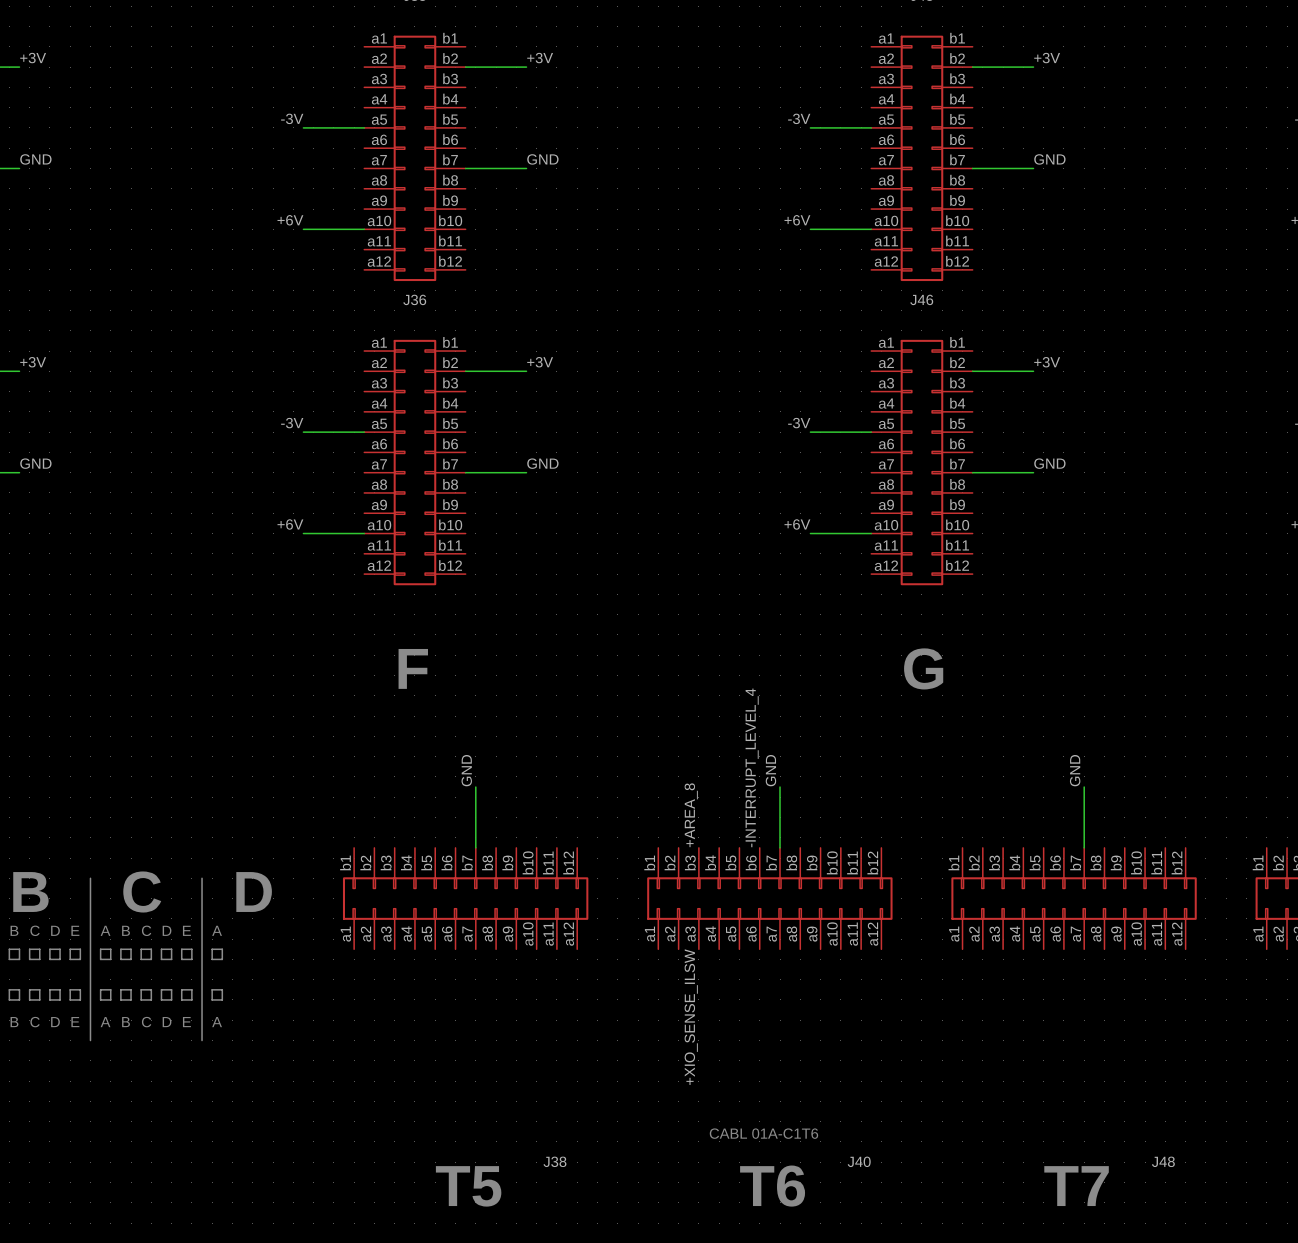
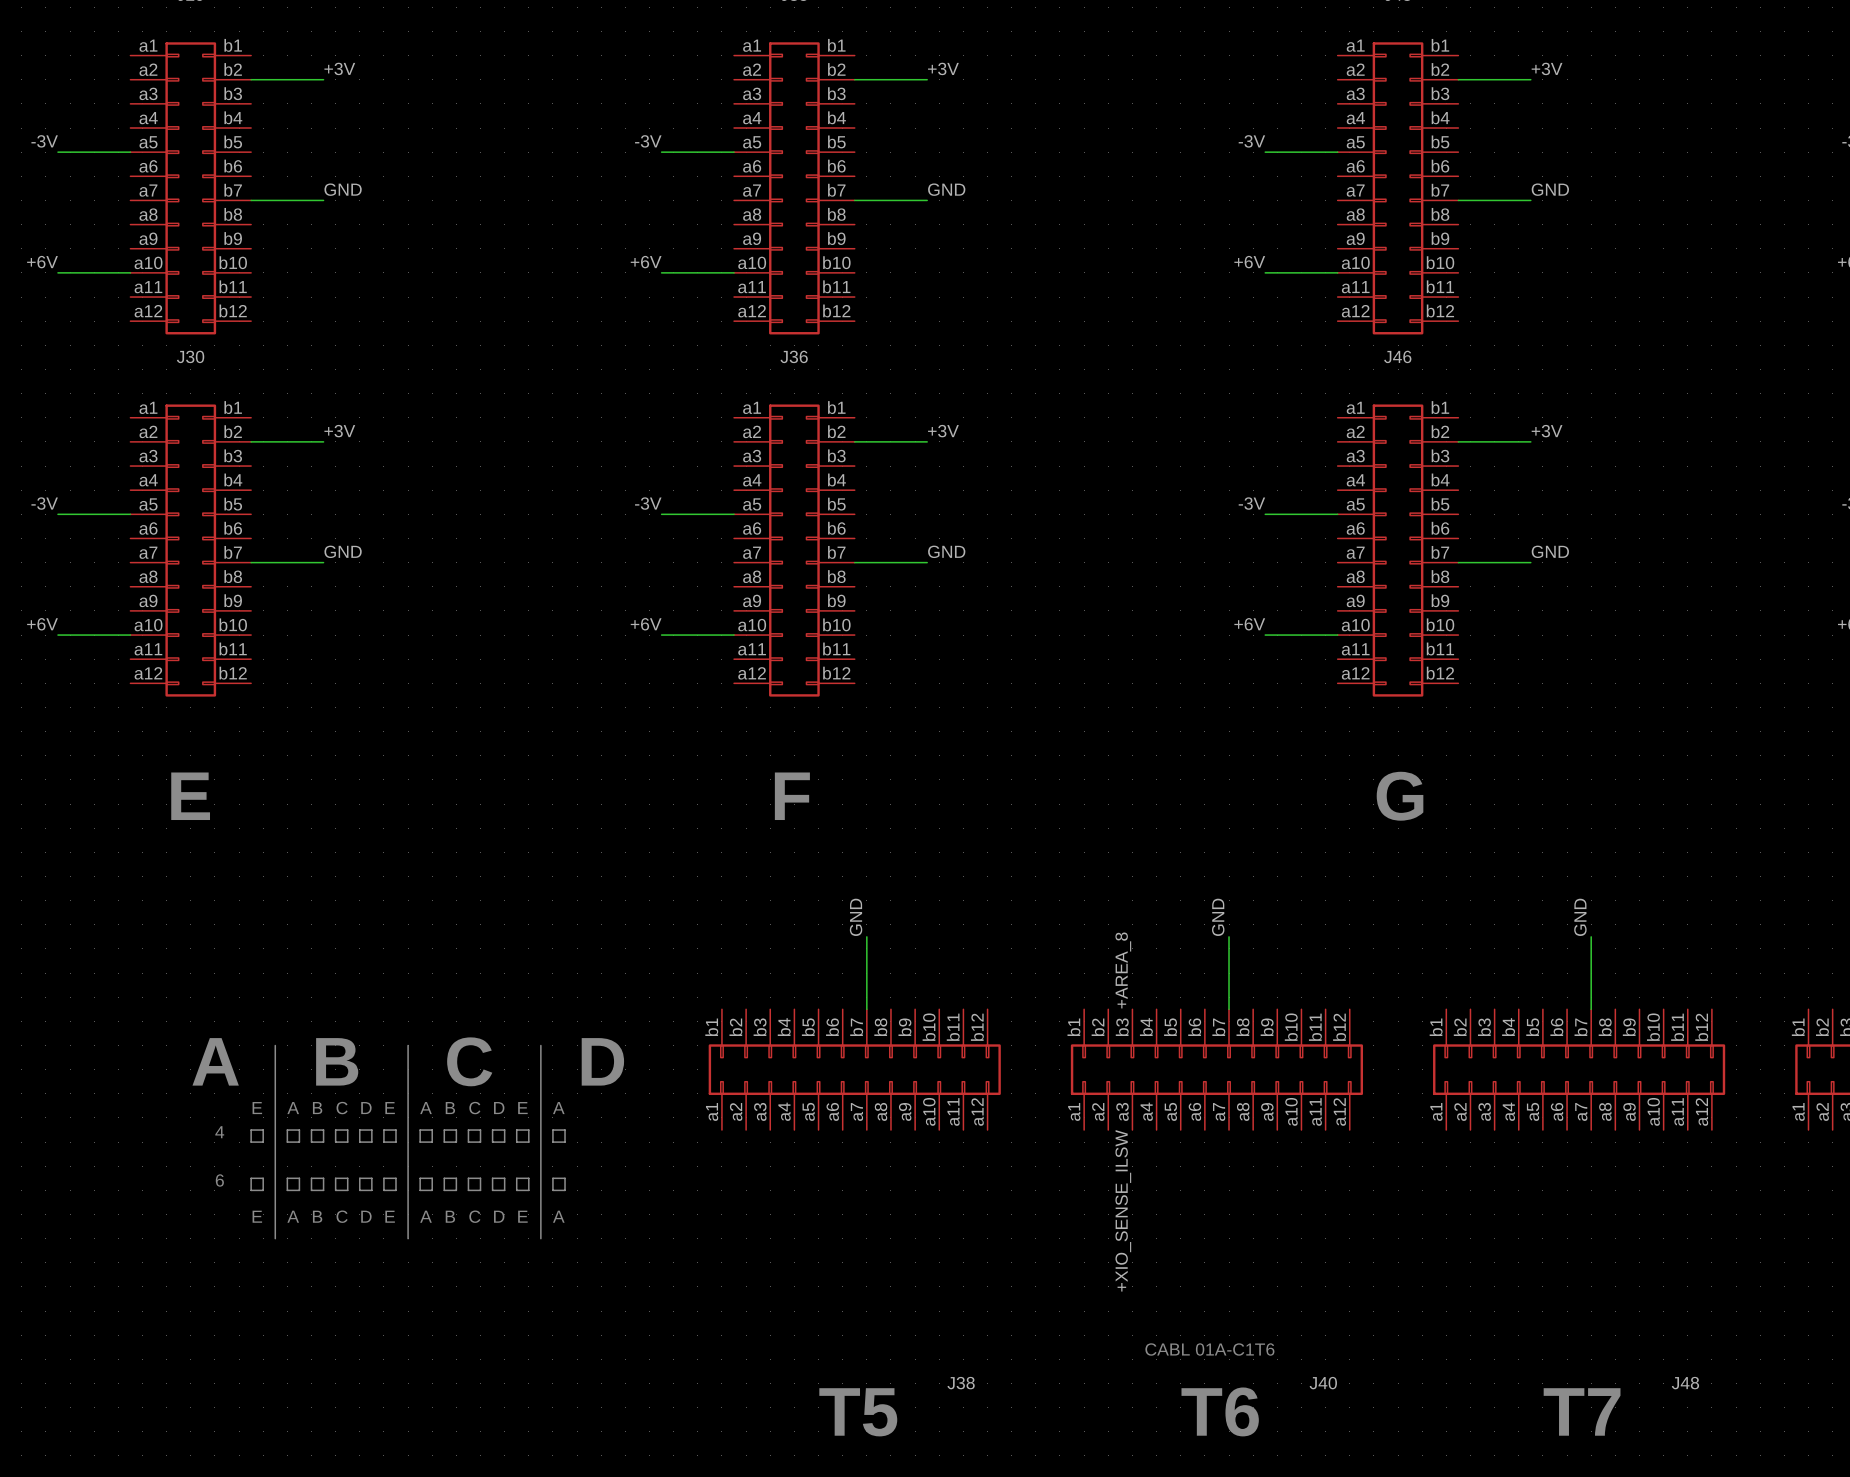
label: -INTERRUPT_LEVEL_4 (752, 767) -> none

